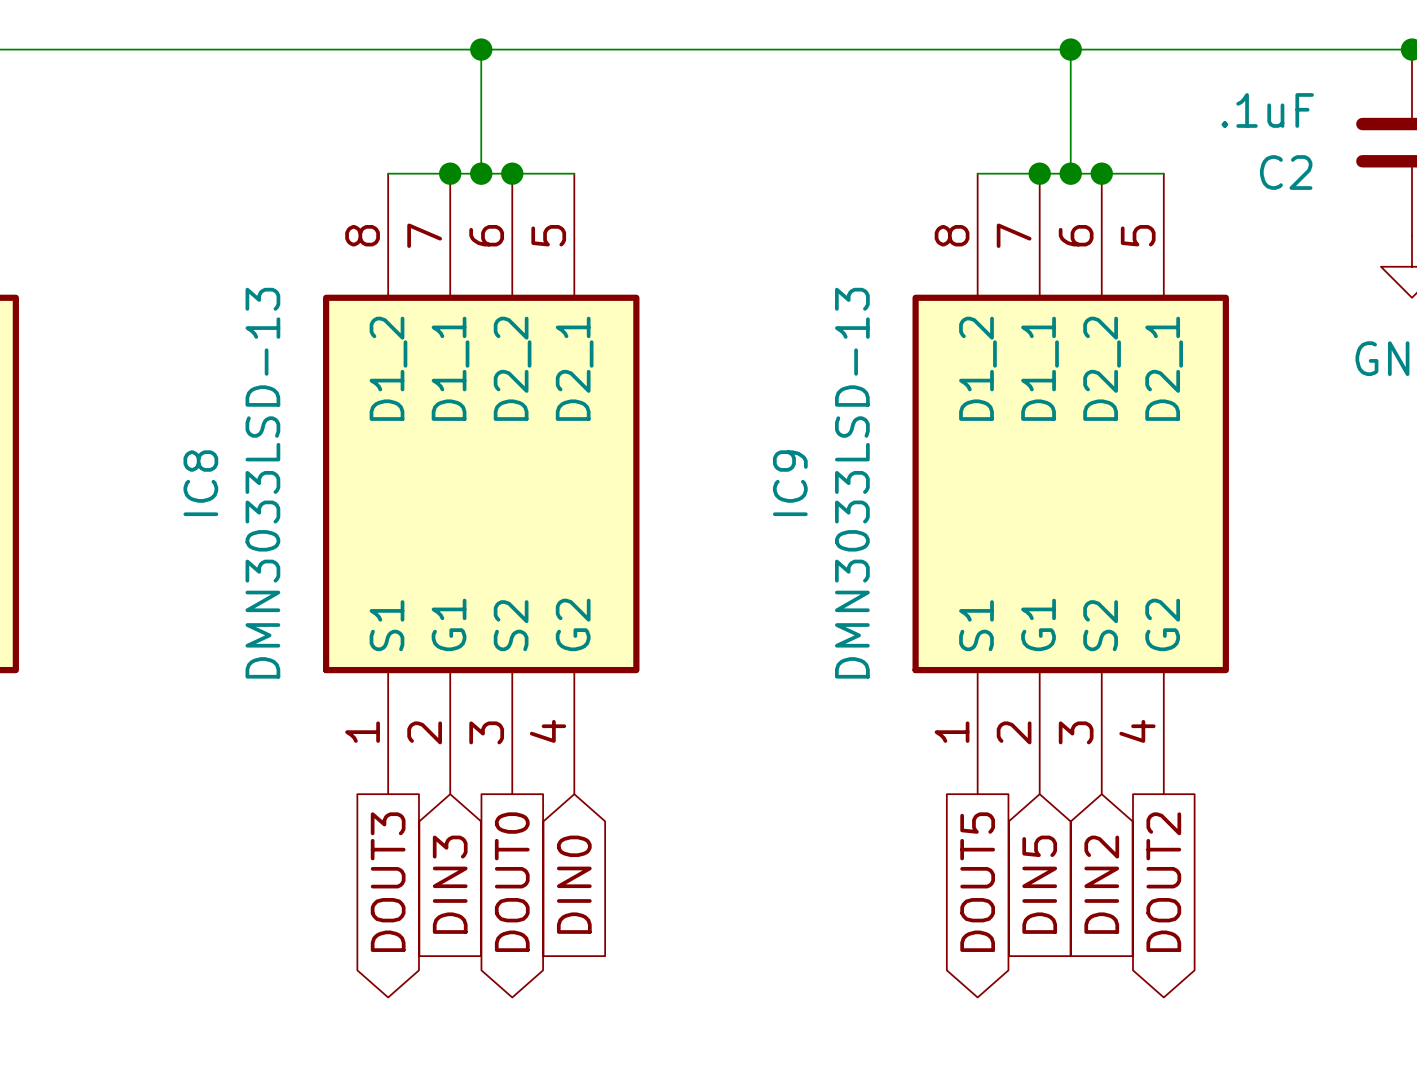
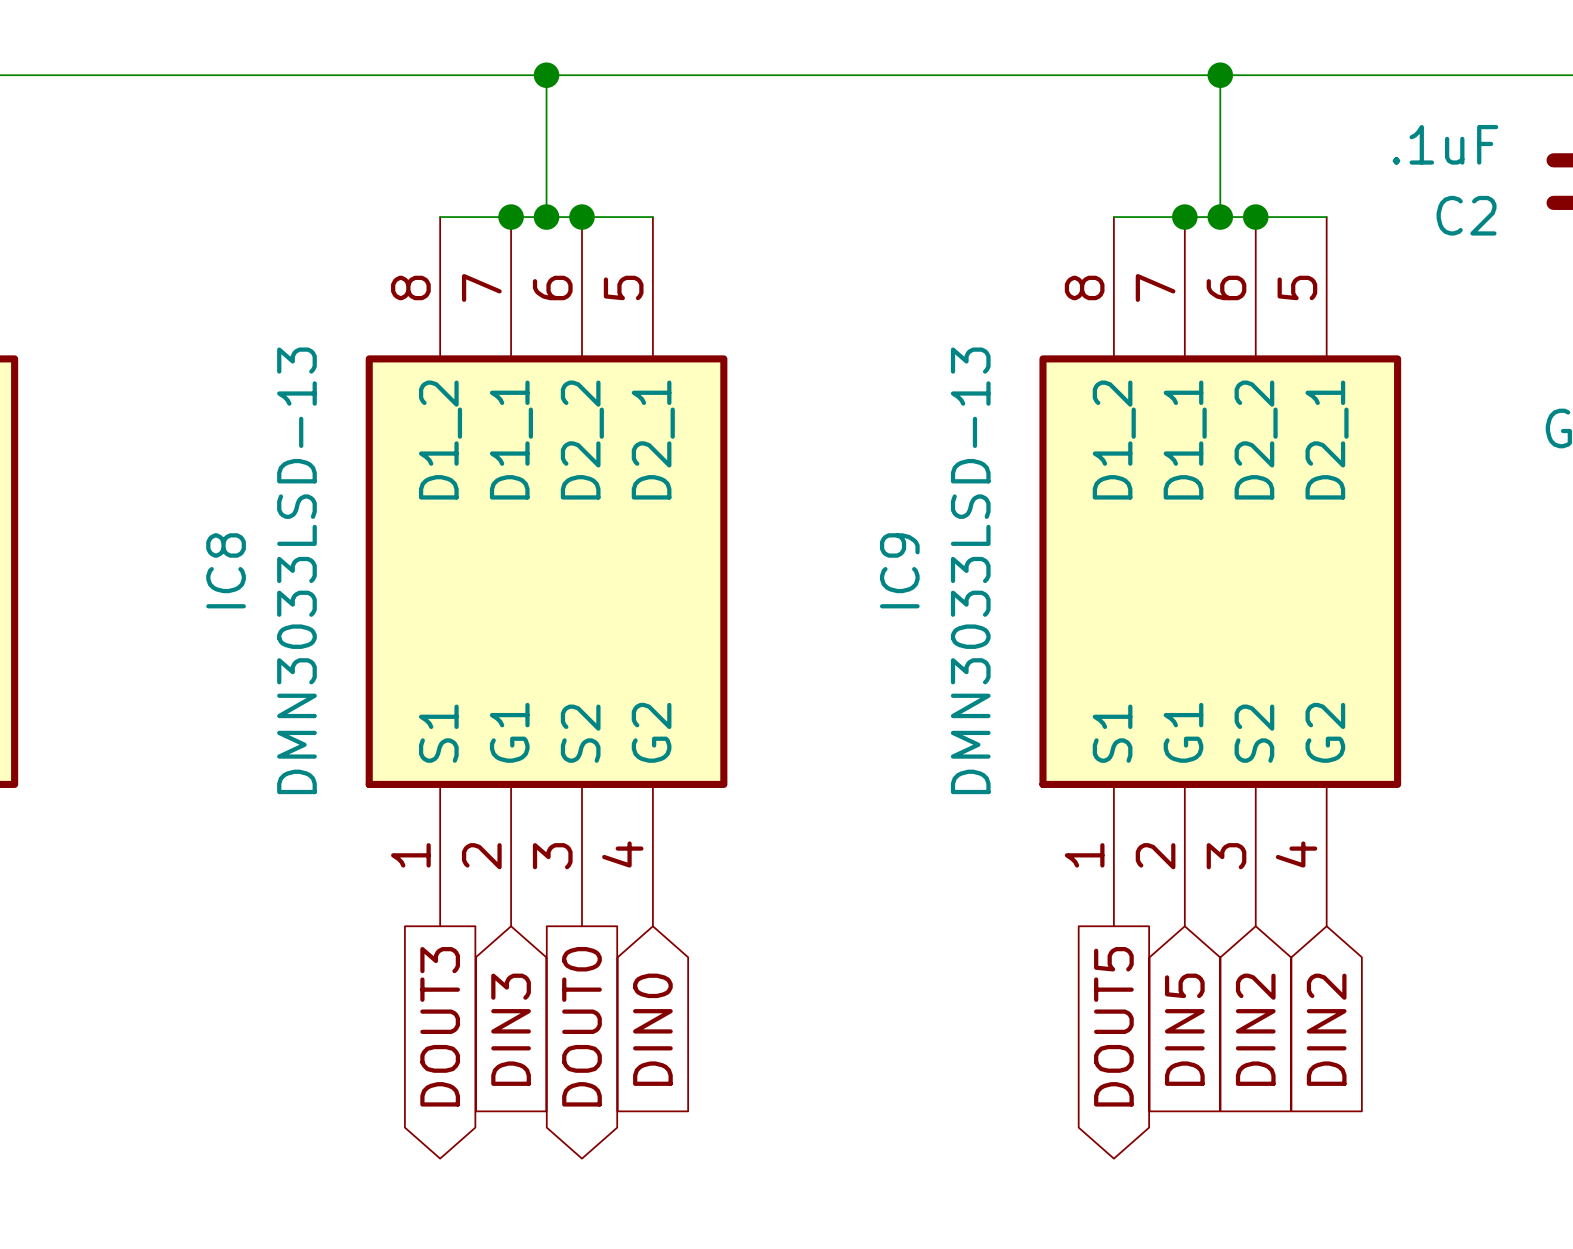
global label shape: output (1163, 882) -> input (1326, 1029)
global label: DOUT2 (1163, 882) -> DIN2 (1326, 1029)

